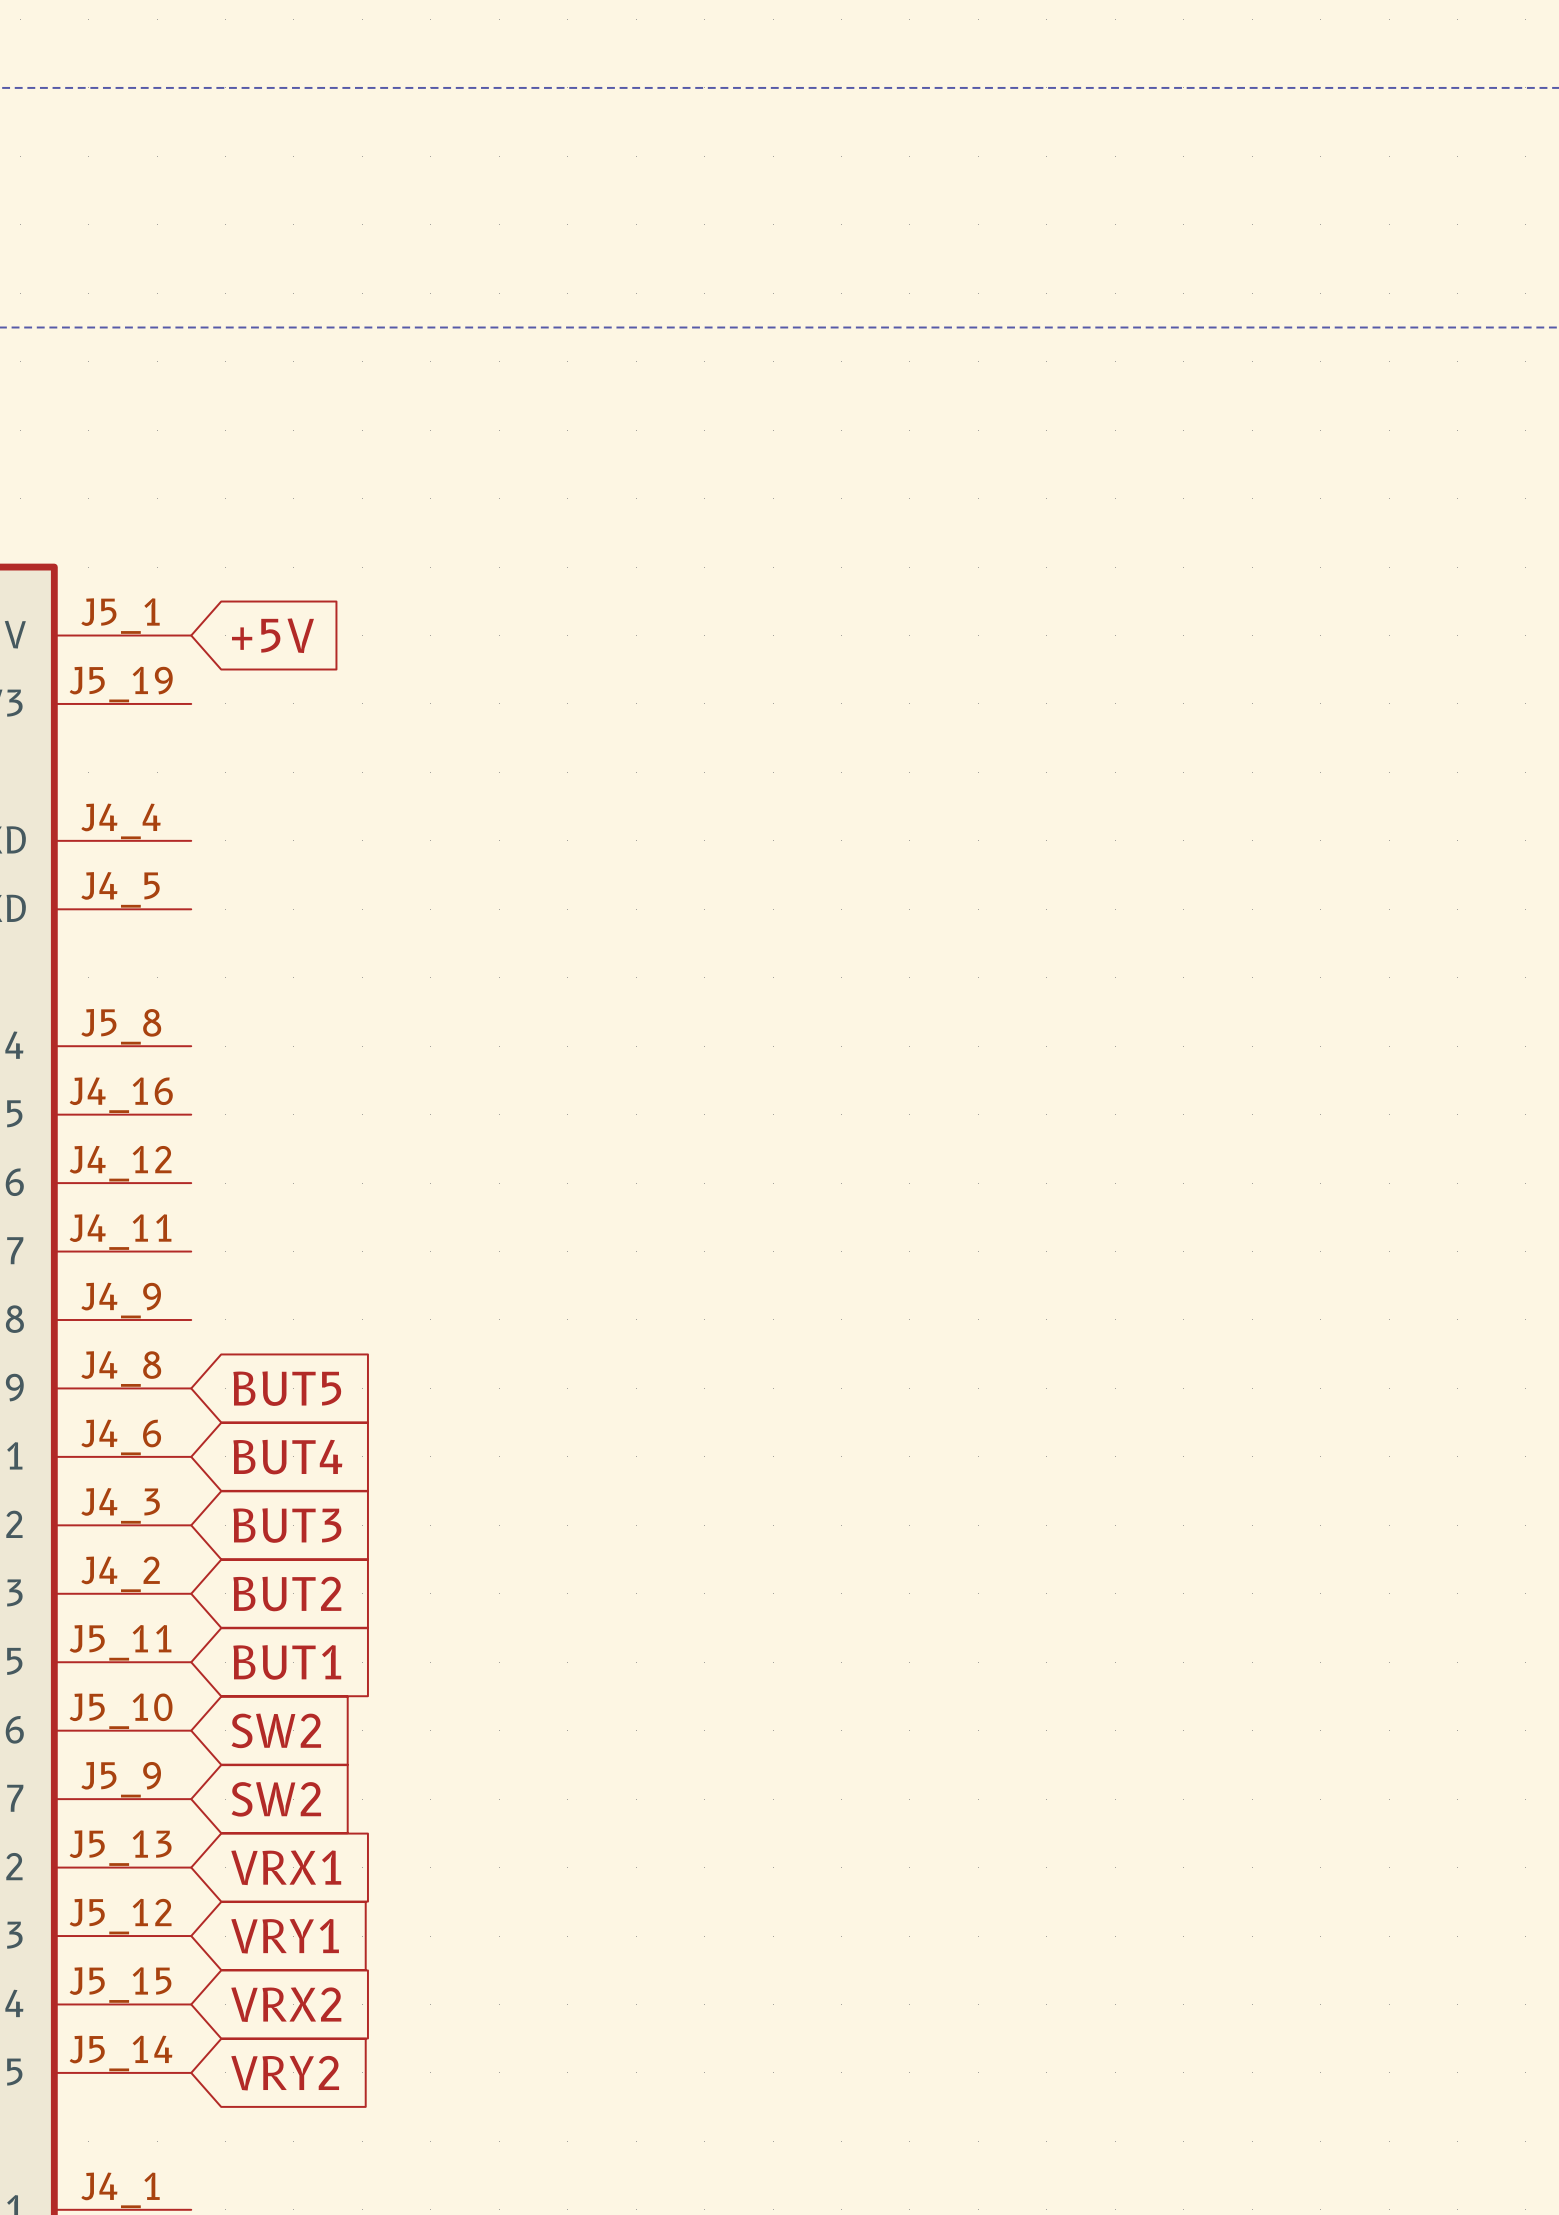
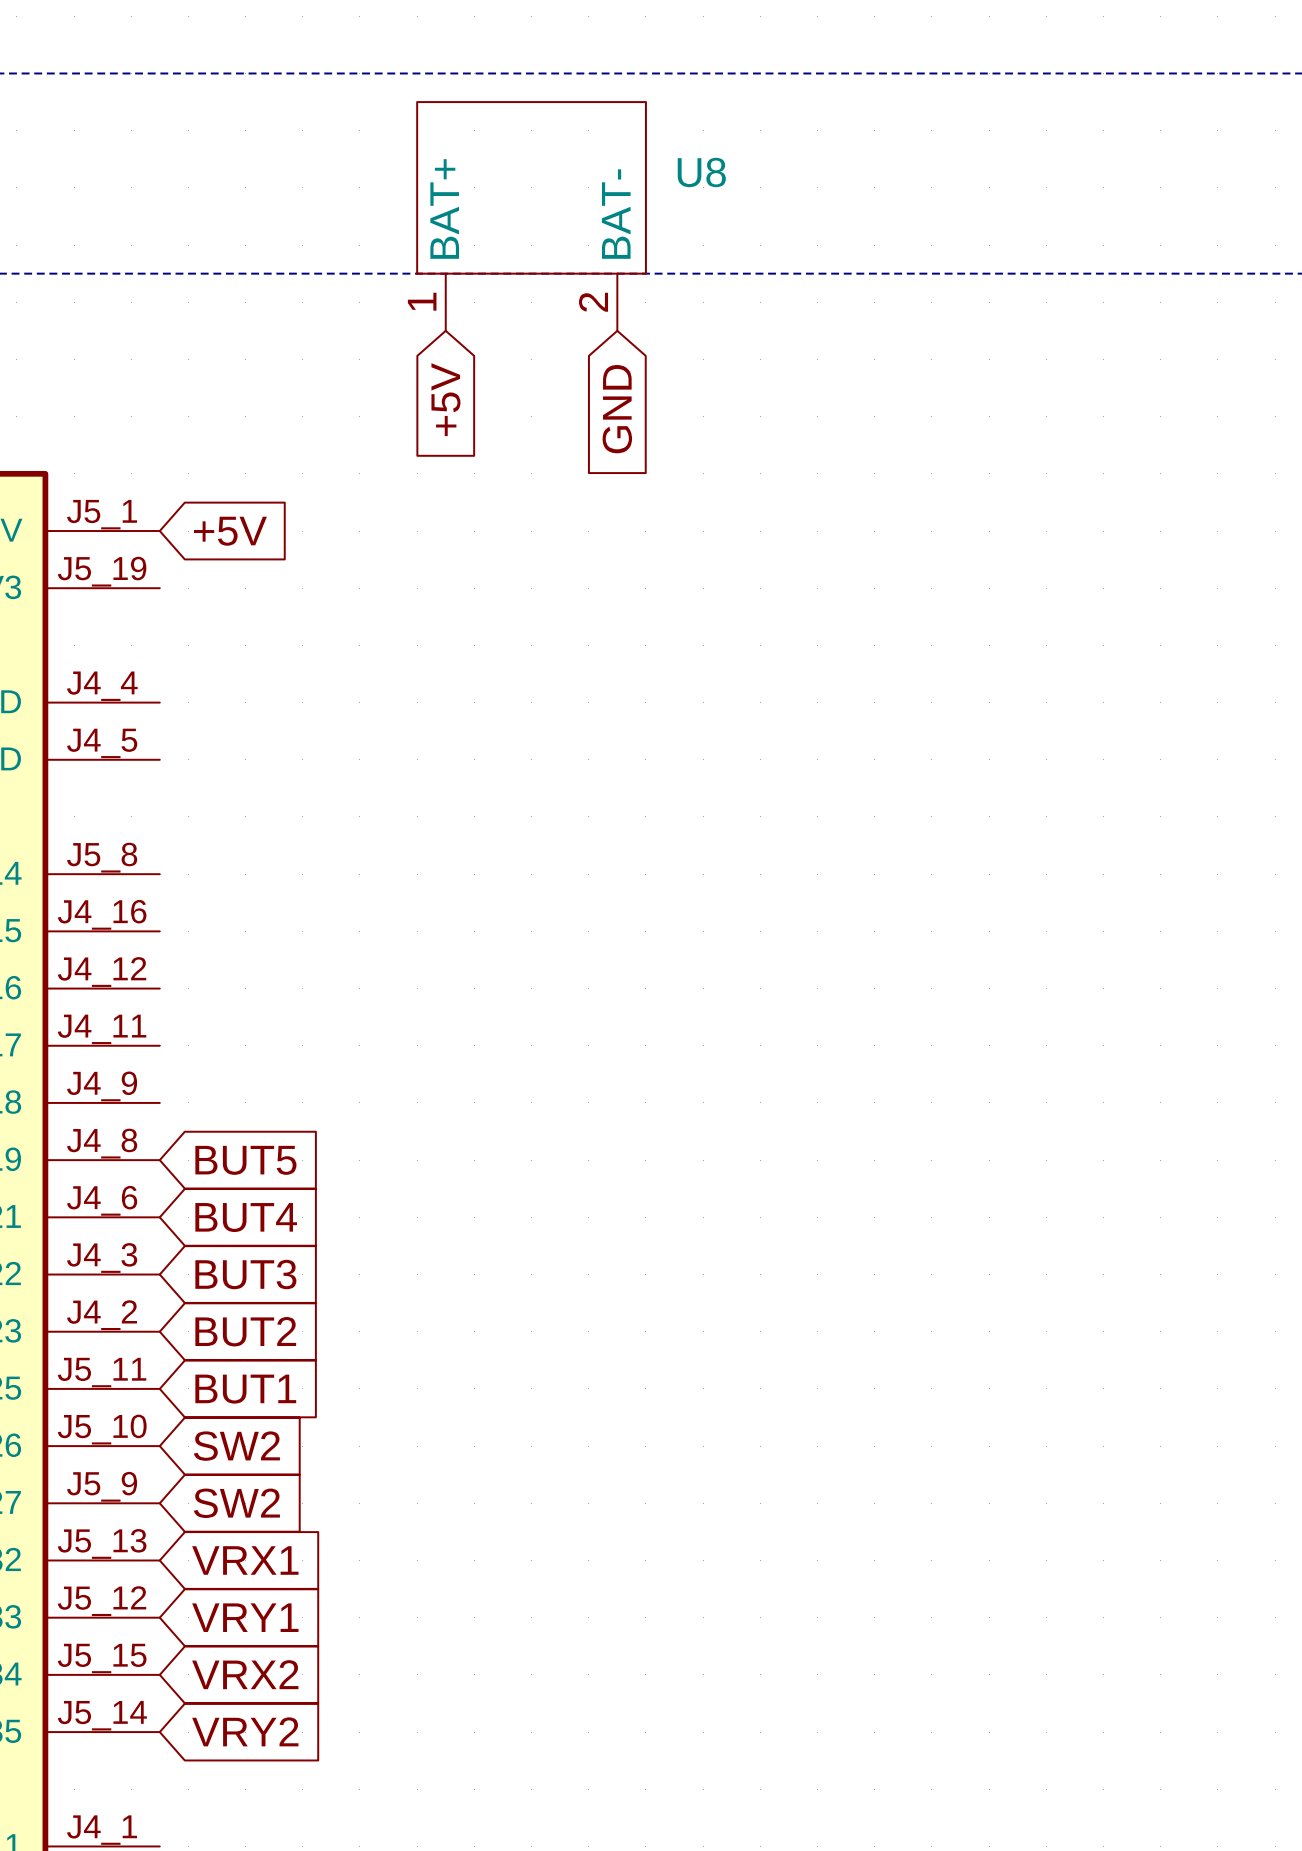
U8: none -> (531, 216)
global label: none -> +5V (445, 399)
global label: none -> GND (617, 409)

